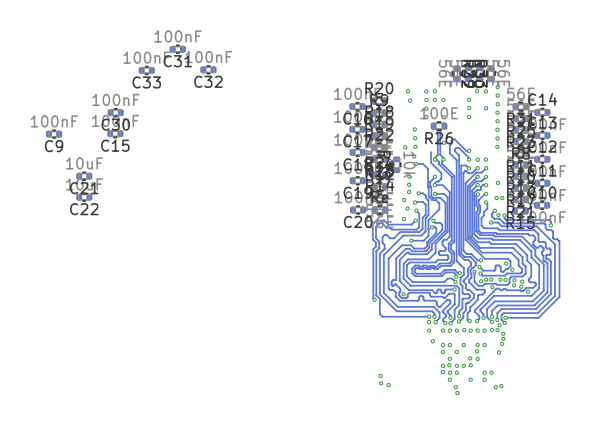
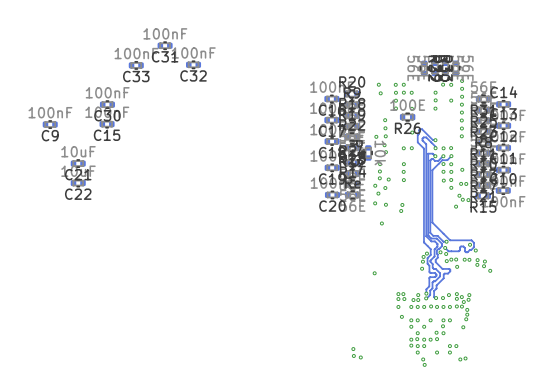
track: (433, 126) (437, 130) (437, 154) (434, 159) (451, 176) (451, 240) (448, 243) (451, 261) (449, 263) (439, 263) (436, 266) (415, 265) (412, 268) (412, 273) (415, 276) (441, 276) (445, 272) (453, 272) (456, 276) -> none
track: (444, 126) (440, 130) (440, 154) (443, 158) (441, 163) (454, 175) (454, 241) (451, 244) (451, 249) (454, 252) (454, 262) (450, 265) (440, 265) (437, 268) (416, 267) (414, 272) (440, 273) (444, 269) (454, 269) (459, 273) -> none
track: (431, 152) (431, 162) (441, 173) (441, 178) (434, 185) (442, 185) (449, 192) (449, 236) (442, 241) (445, 249) (438, 252) (440, 255) (447, 255) (448, 258) (437, 259) (435, 262) (409, 262) (406, 265) (406, 276) (412, 282) (444, 282) (447, 278) (452, 278) (455, 281) -> none
track: (415, 163) (423, 163) (428, 168) (428, 196) (439, 203) (439, 209) (428, 220) (428, 229) -> none
track: (434, 176) (430, 181) (431, 196) (440, 197) (445, 202) (445, 230) (431, 244) (431, 249) (426, 254) (406, 252) (399, 259) (399, 281) (408, 290) (432, 290) (436, 293) (440, 289) (443, 293) (445, 289) (454, 289) -> none
track: (477, 176) (467, 186) (467, 238) (481, 252) (511, 252) (518, 260) (518, 265) (521, 268) (520, 273) (507, 273) (504, 275) (482, 275) (480, 273) -> none
track: (485, 176) (481, 181) (475, 181) (469, 187) (469, 237) (480, 247) (513, 247) (522, 257) (525, 273) (522, 276) (511, 276) (507, 284) (484, 283) (478, 285) (474, 281) (474, 271) -> none
track: (477, 185) (472, 190) (472, 236) (477, 242) (516, 244) (527, 255) (527, 260) (531, 264) (531, 276) (528, 281) (534, 282) (535, 285) (533, 287) (526, 287) (523, 290) (496, 288) (475, 310) (479, 316) (477, 321) -> none
track: (486, 185) (482, 185) (479, 190) (474, 192) (474, 234) (476, 236) -> none
track: (418, 193) (423, 193) (428, 200) (425, 231) (421, 235) (403, 235) (383, 254) (383, 292) (397, 306) (433, 306) (439, 312) (439, 318) (435, 322) -> none
track: (434, 193) (444, 193) (447, 197) (447, 231) (435, 243) (435, 252) (428, 259) (408, 259) (403, 263) (403, 278) (410, 285) (456, 285) (459, 288) (459, 305) (454, 309) (454, 318) (450, 323) -> none
track: (485, 193) (478, 200) (480, 212) (478, 214) (478, 230) (480, 232) (533, 235) (535, 237) (533, 244) (536, 247) (541, 246) (543, 248) (543, 260) (547, 263) (547, 292) (534, 305) (497, 305) (492, 311) (492, 316) -> none
track: (477, 194) (476, 196) (478, 207) (476, 231) (480, 235) (522, 236) (535, 249) (535, 255) (543, 264) (543, 290) (532, 301) (494, 301) (487, 308) (487, 317) (492, 321) -> none
track: (415, 202) (423, 201) (425, 204) (422, 228) (419, 232) (400, 232) (394, 238) (384, 235) (382, 242) (384, 249) -> none
track: (486, 202) (487, 208) (481, 217) (481, 225) (484, 228) (534, 230) (538, 234) (538, 241) (544, 241) (545, 247) (550, 249) (550, 254) (547, 254) (546, 258) (550, 261) (550, 293) (535, 309) (501, 309) (497, 313) (497, 319) -> none
track: (416, 210) (419, 213) (419, 227) (416, 229) (392, 229) (382, 223) (376, 226) (376, 238) (379, 241) (379, 248) (376, 251) (376, 295) (379, 299) (379, 314) (382, 316) (429, 316) -> none
via: (416, 210) -> none
track: (494, 210) (491, 216) (494, 218) (499, 218) (504, 223) (544, 223) (547, 229) (553, 231) (553, 237) (559, 241) (559, 297) (538, 317) (505, 317) -> none
track: (504, 215) (506, 220) (549, 220) (550, 225) -> none
track: (415, 220) (411, 224) (388, 224) (384, 220) (376, 220) (372, 224) (372, 239) (375, 242) (373, 249) (374, 299) -> none
track: (433, 220) (442, 224) (442, 230) (429, 243) (429, 247) (425, 251) (412, 251) (405, 248) (396, 258) (396, 279) (391, 281) (391, 284) (395, 284) (400, 288) (399, 295) (401, 297) (406, 297) (409, 292) (429, 292) (431, 296) (443, 298) (449, 293) (453, 293) (454, 304) (447, 311) -> none
track: (491, 222) (498, 222) (501, 226) (536, 226) (554, 244) (554, 295) (537, 313) (503, 313) (501, 319) (504, 322) -> none
via: (550, 225) -> none
track: (432, 227) (436, 228) (436, 233) (427, 242) (424, 248) (414, 248) (410, 245) (401, 245) (388, 258) (388, 288) (395, 292) (395, 296) (399, 300) (418, 300) (419, 297) (422, 296) (424, 300) (435, 300) (440, 306) (446, 300) (449, 300) (450, 303) (442, 311) (445, 314) (443, 318) (445, 323) -> none
track: (428, 229) (428, 235) (423, 240) (411, 240) -> none
track: (476, 236) (478, 238) (493, 239) (519, 239) (531, 251) (531, 257) (539, 265) (539, 288) (531, 295) (494, 295) (480, 309) (483, 317) -> none
track: (384, 249) (379, 253) (379, 294) (396, 311) (432, 311) (434, 316) -> none
via: (374, 299) -> none
track: (447, 311) (450, 317) -> none

